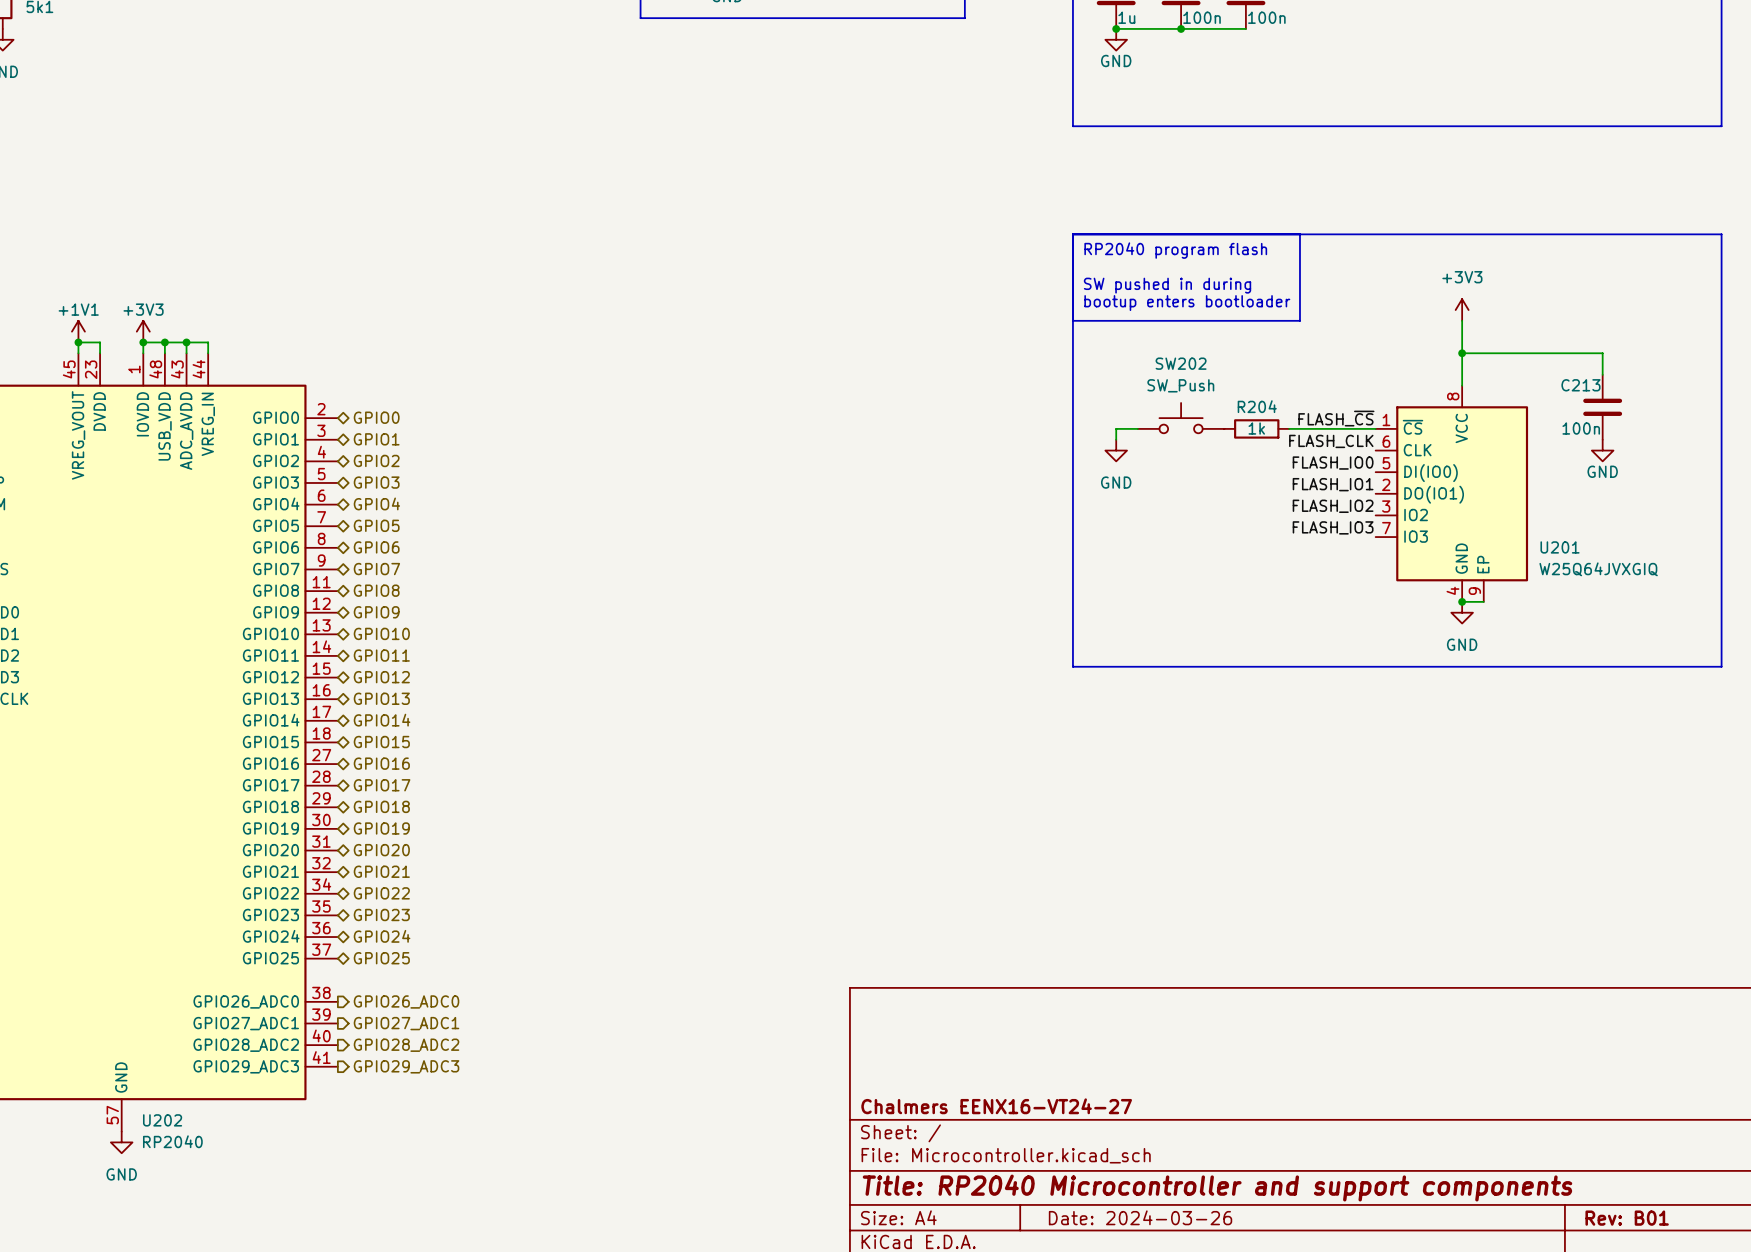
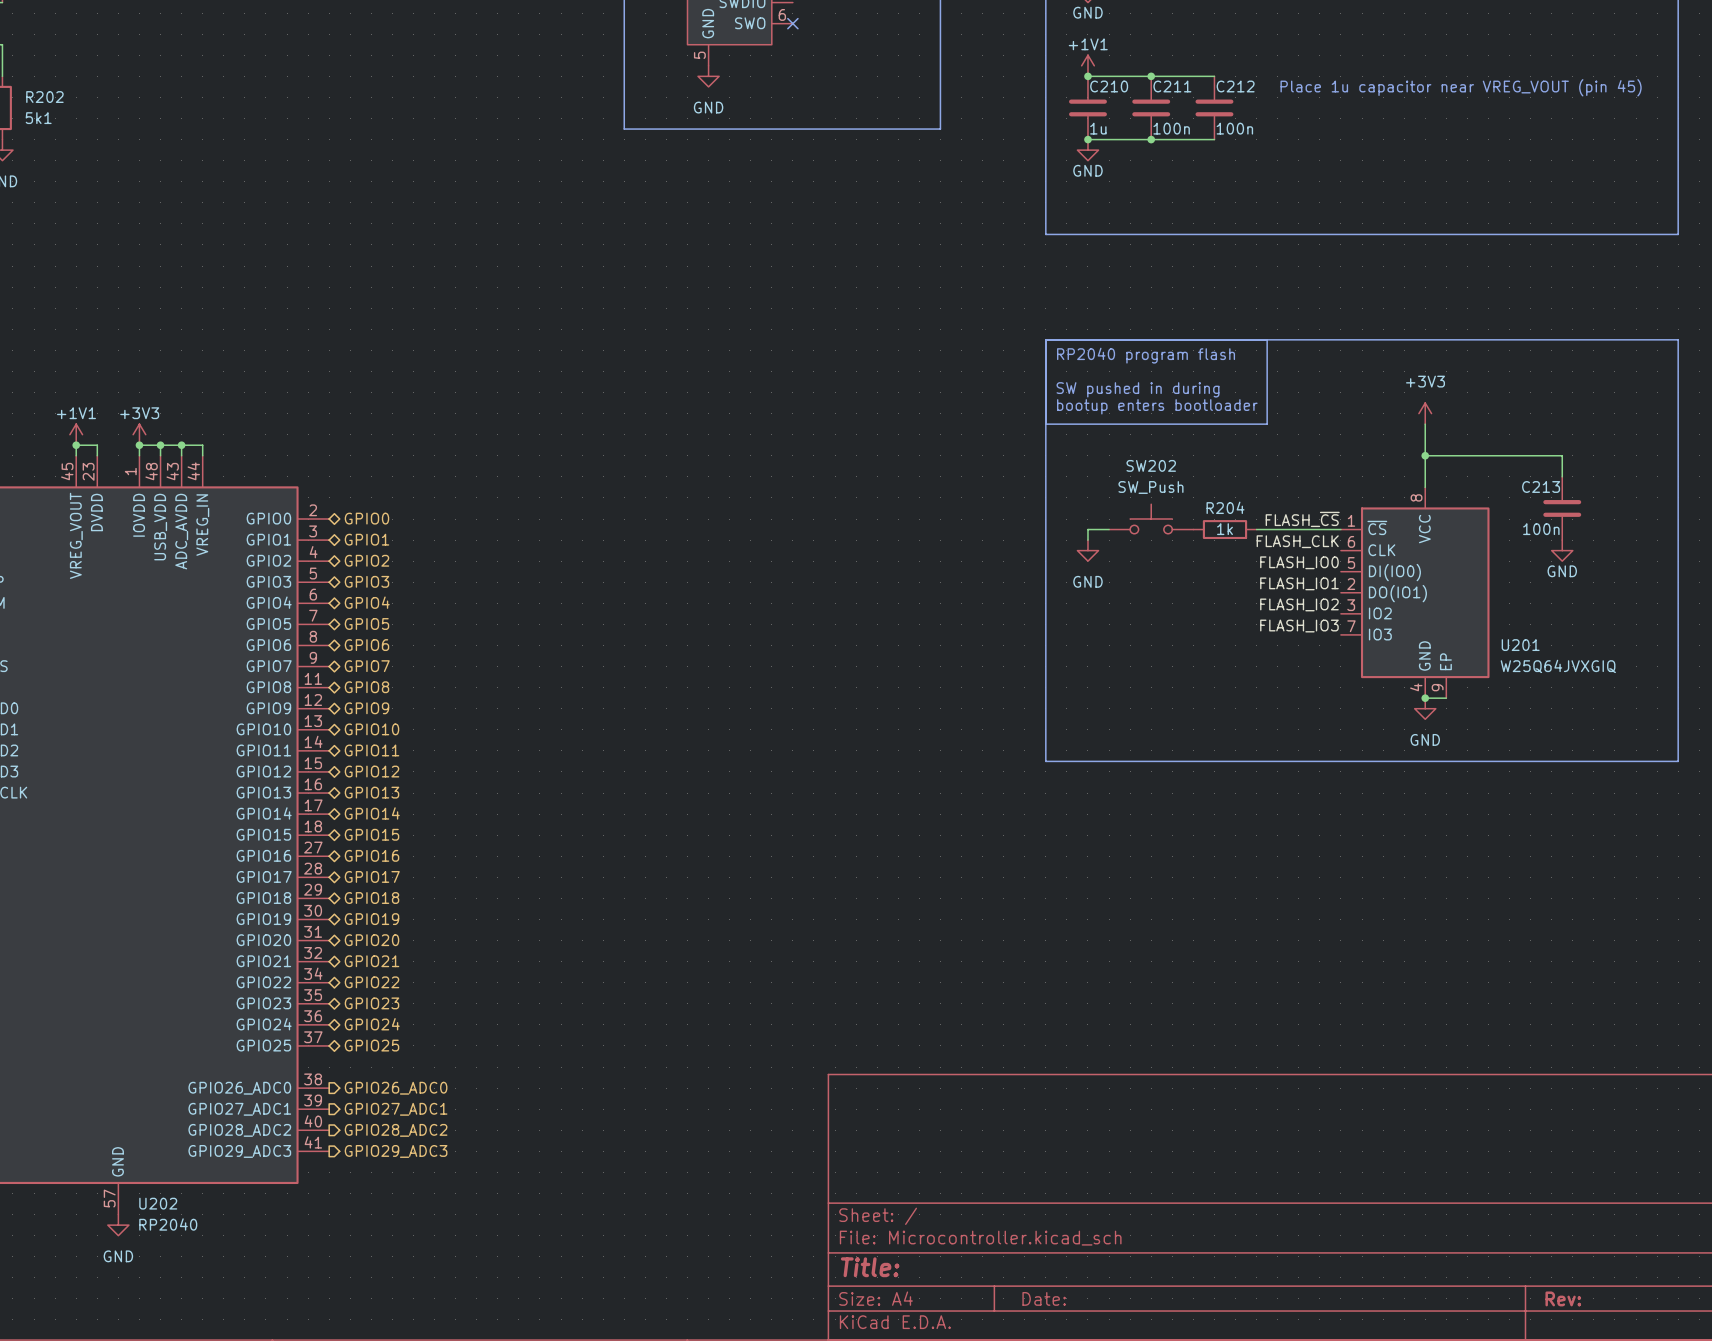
title block: Chalmers EENX16-VT24-27 (996, 1106) -> none
title block: Title: RP2040 Microcontroller and support components (1217, 1188) -> Title: (870, 1267)
title block: Date: 2024-03-26 (1140, 1217) -> Date: (1044, 1298)
title block: Rev: B01 (1627, 1218) -> Rev: (1563, 1298)

